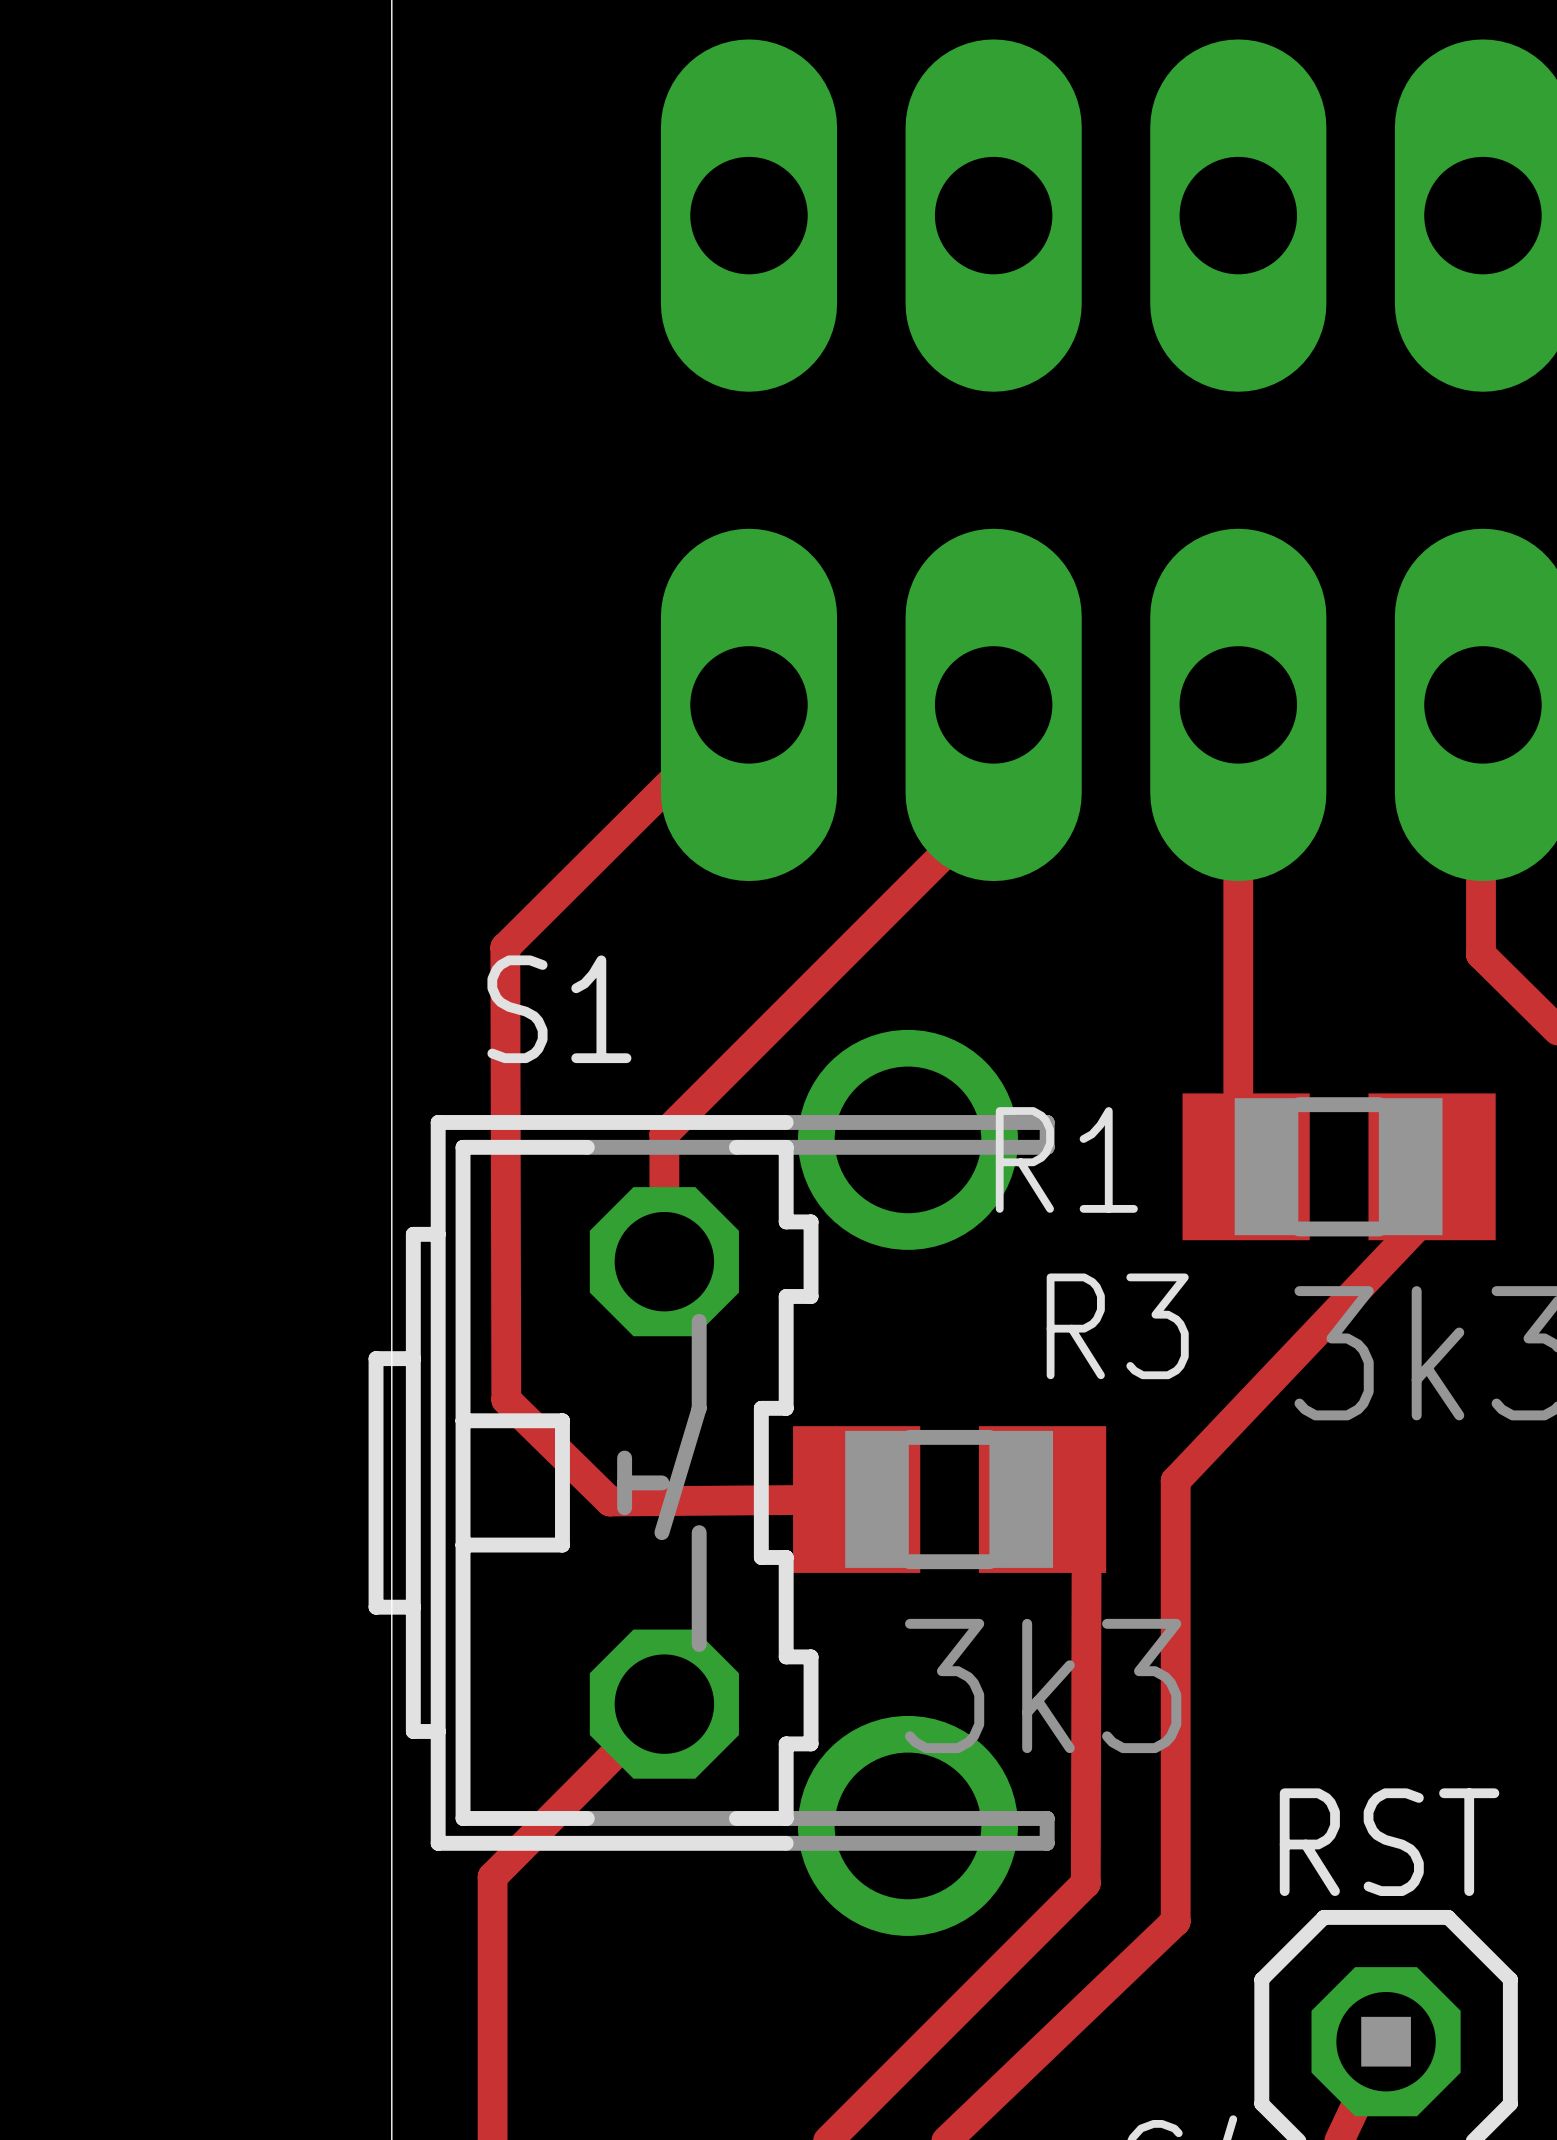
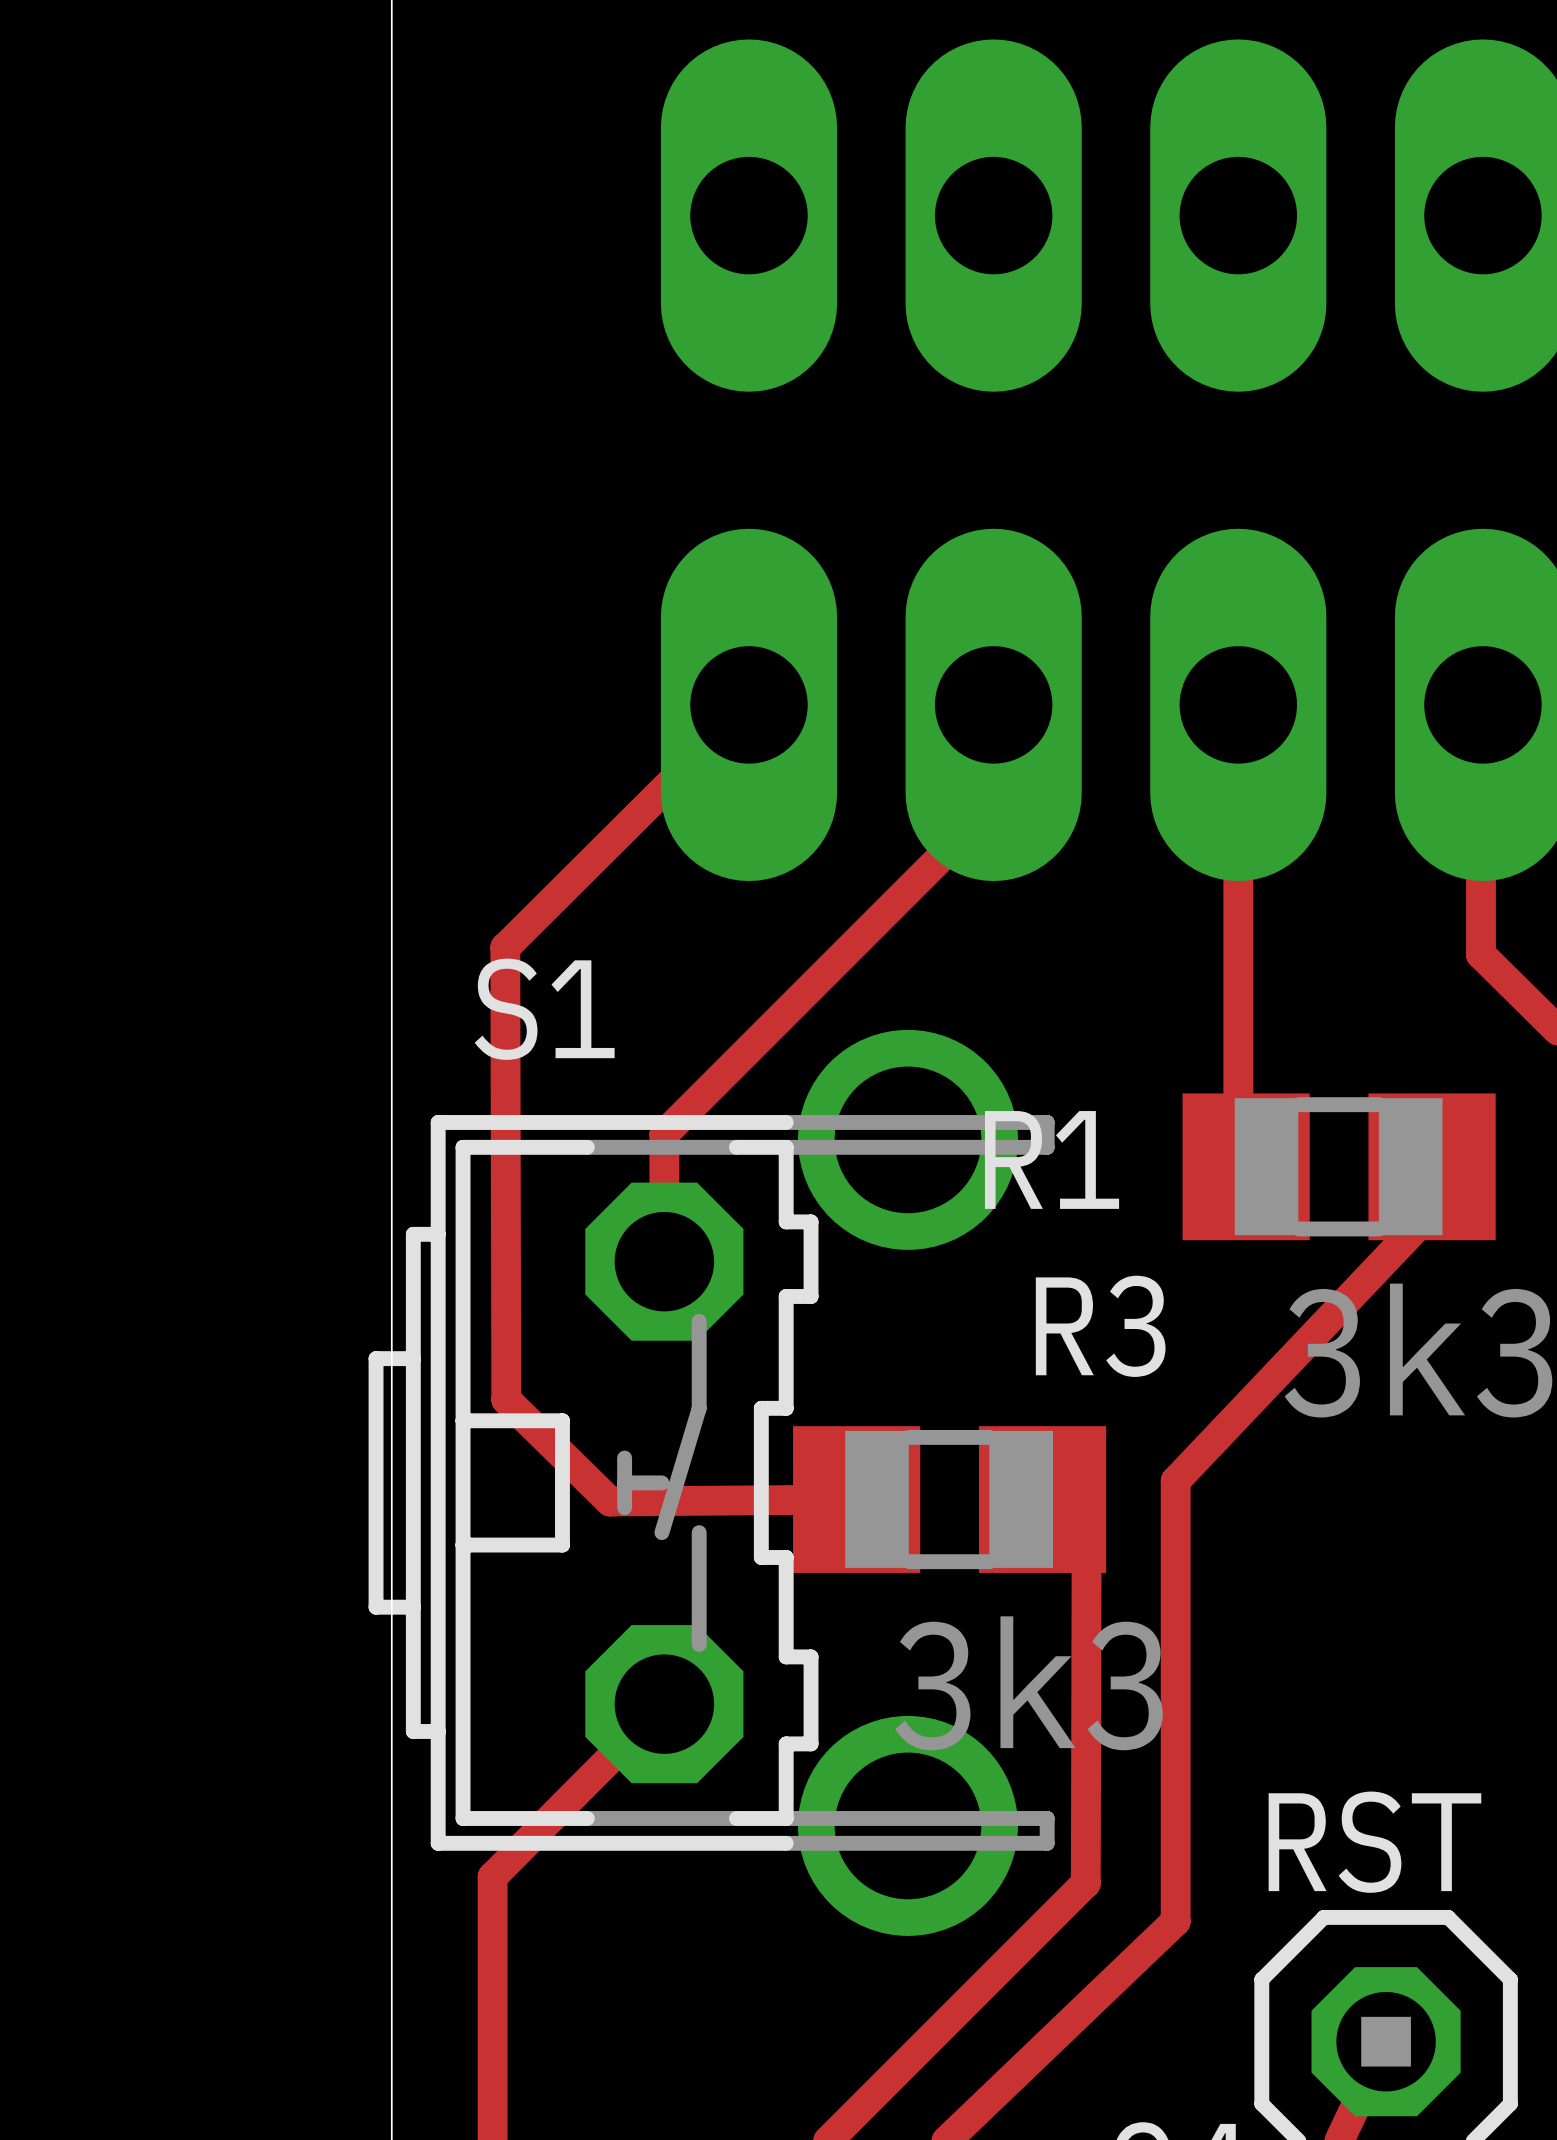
S1 footprint: [368, 1029, 1055, 1936] -> [368, 1029, 1055, 1936]

